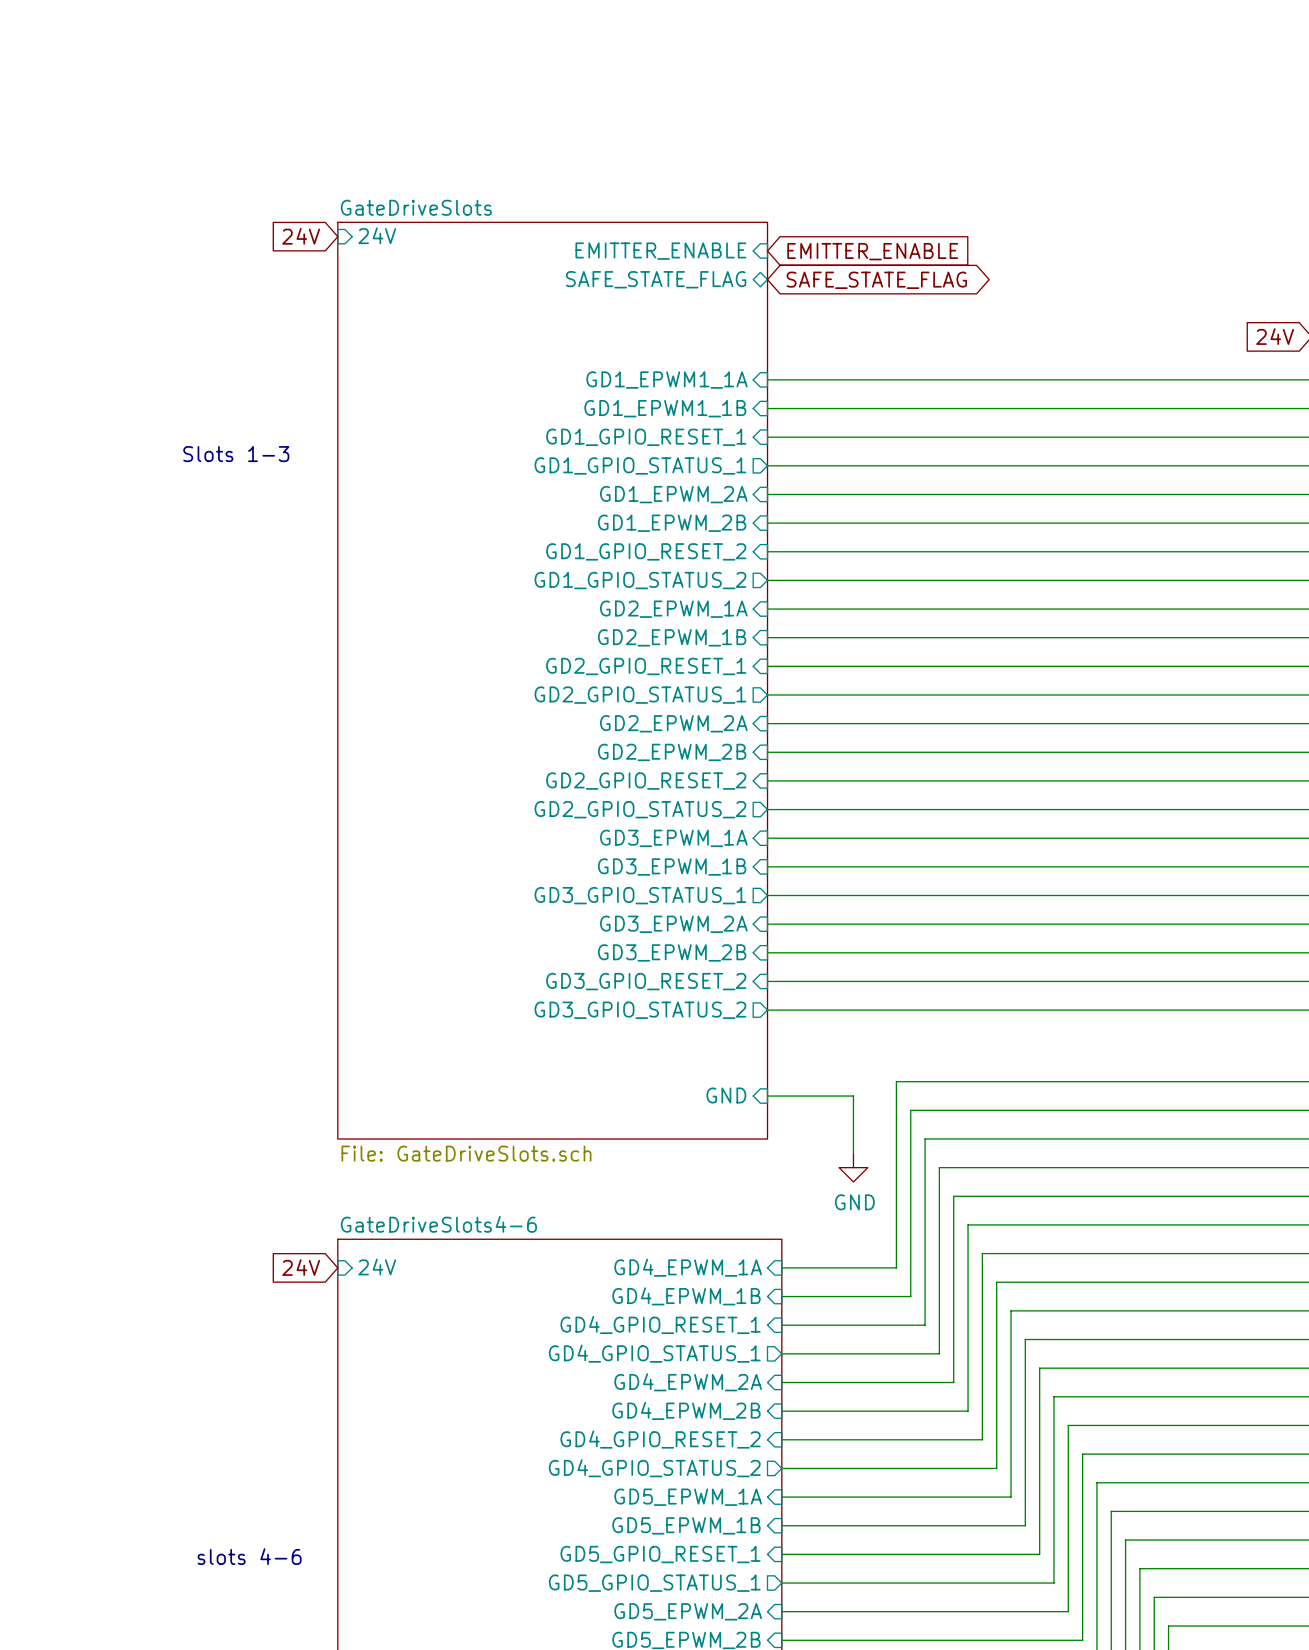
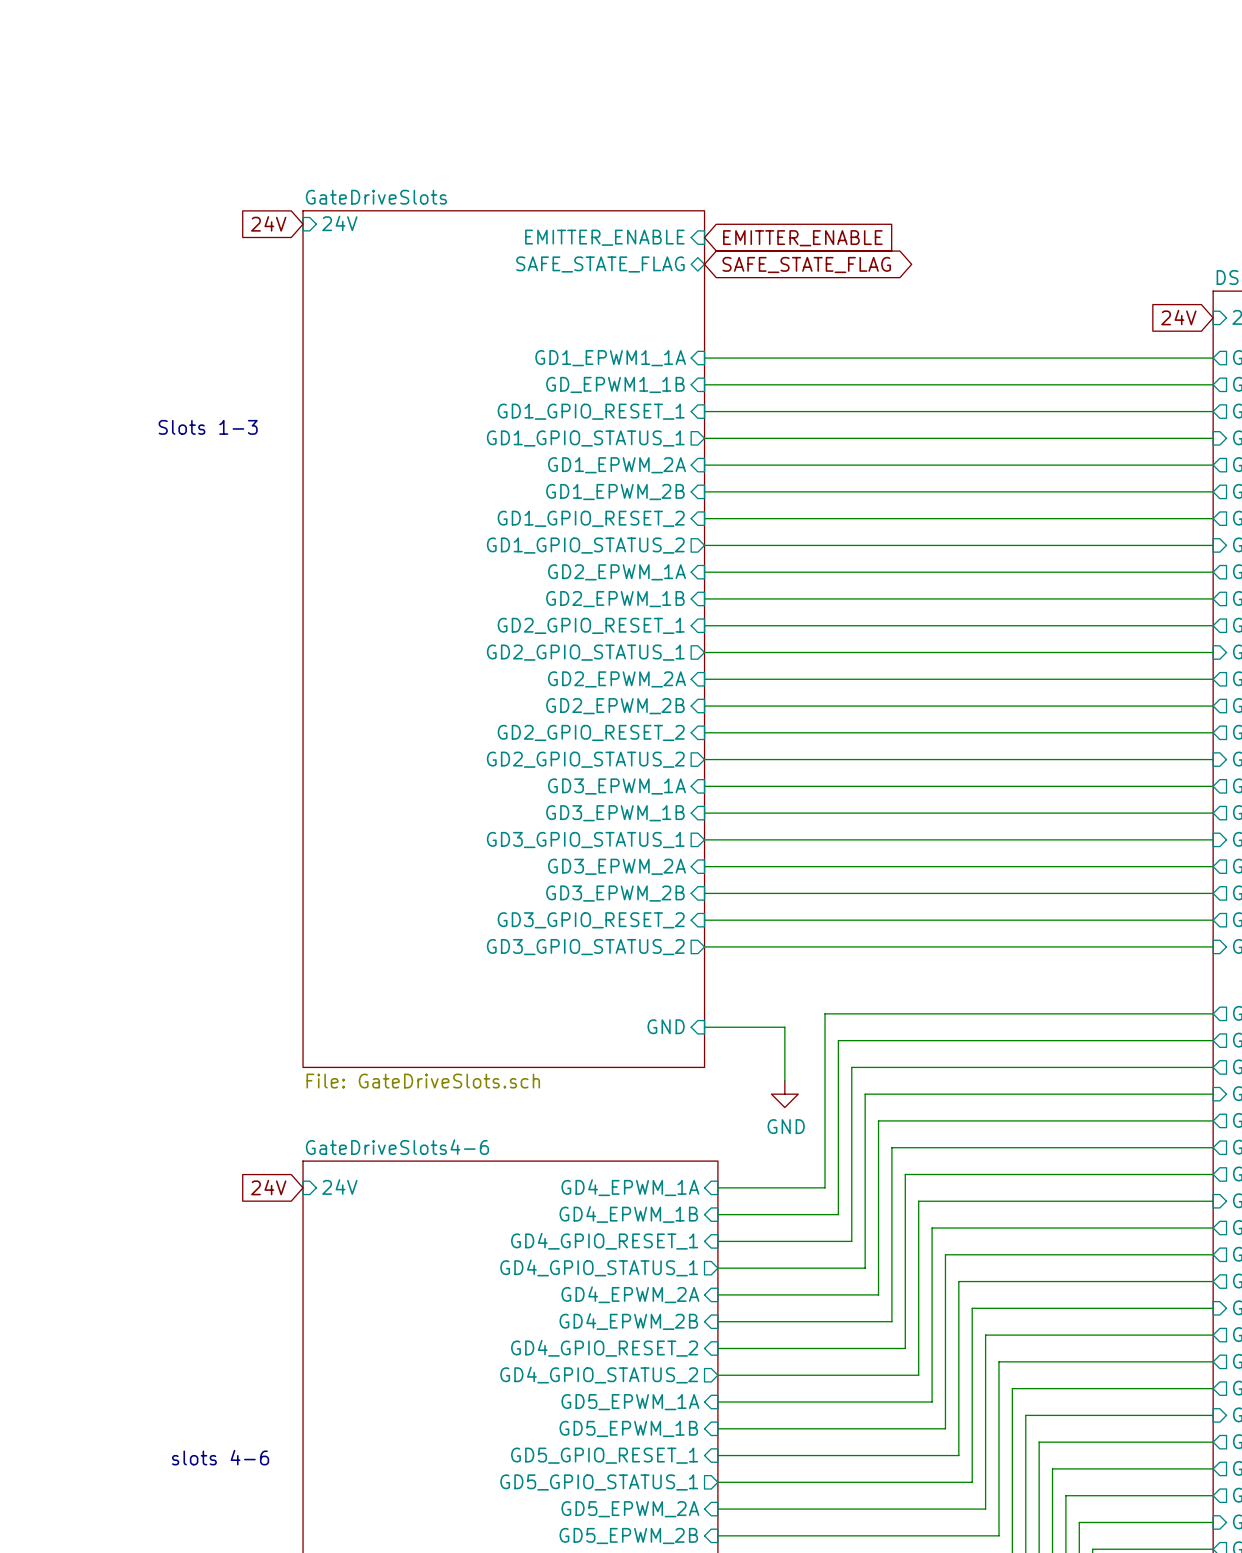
sheet pin: GD1_EPWM1_1B (665, 408) -> GD_EPWM1_1B (615, 384)

